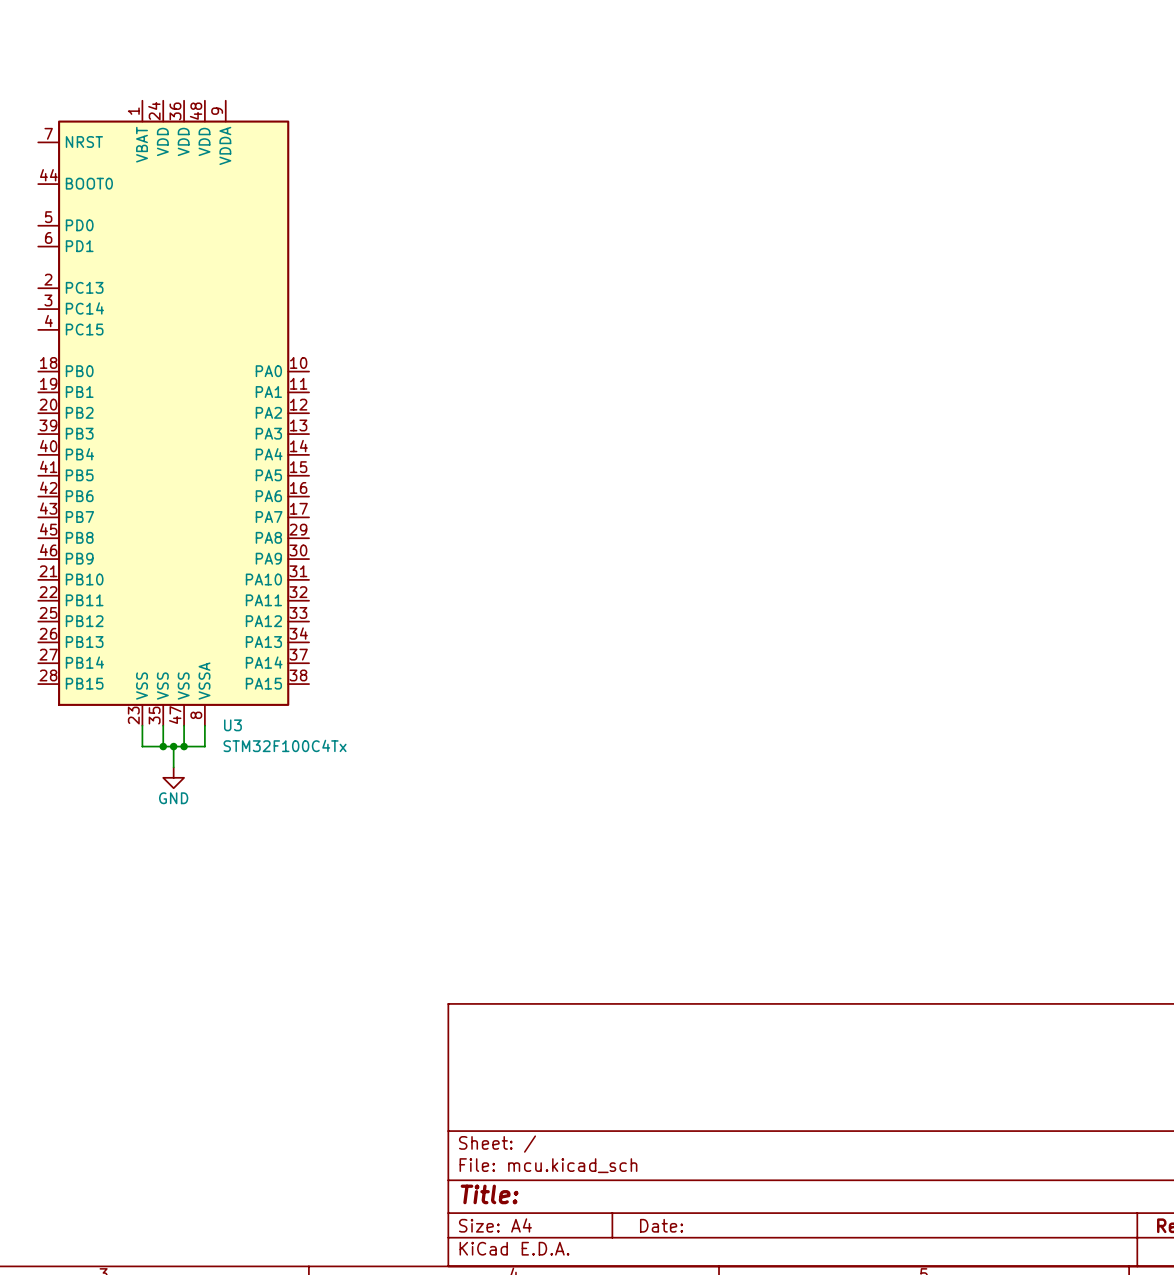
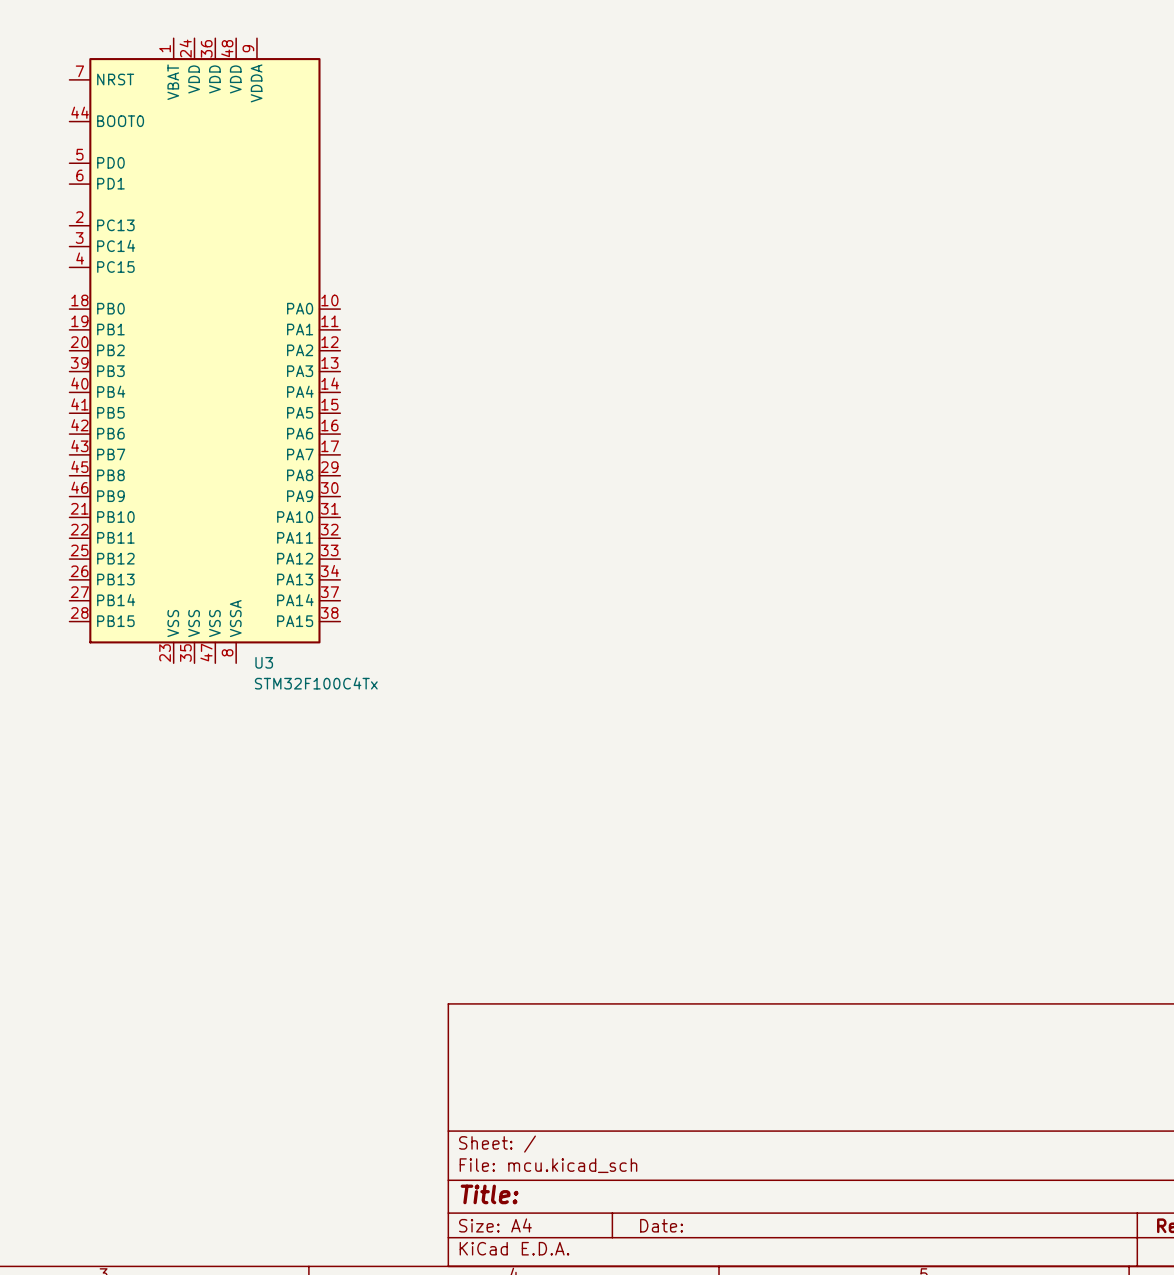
U3 position: (173, 413) -> (204, 350)
wire: (142, 725) (142, 746) (204, 746) (204, 725) -> none
wire: (163, 725) (163, 746) -> none
wire: (184, 725) (184, 746) -> none
junction: (163, 746) -> none
wire: (173, 746) (173, 767) -> none
junction: (173, 746) -> none
junction: (184, 746) -> none
power symbol: GND (173, 777) -> none

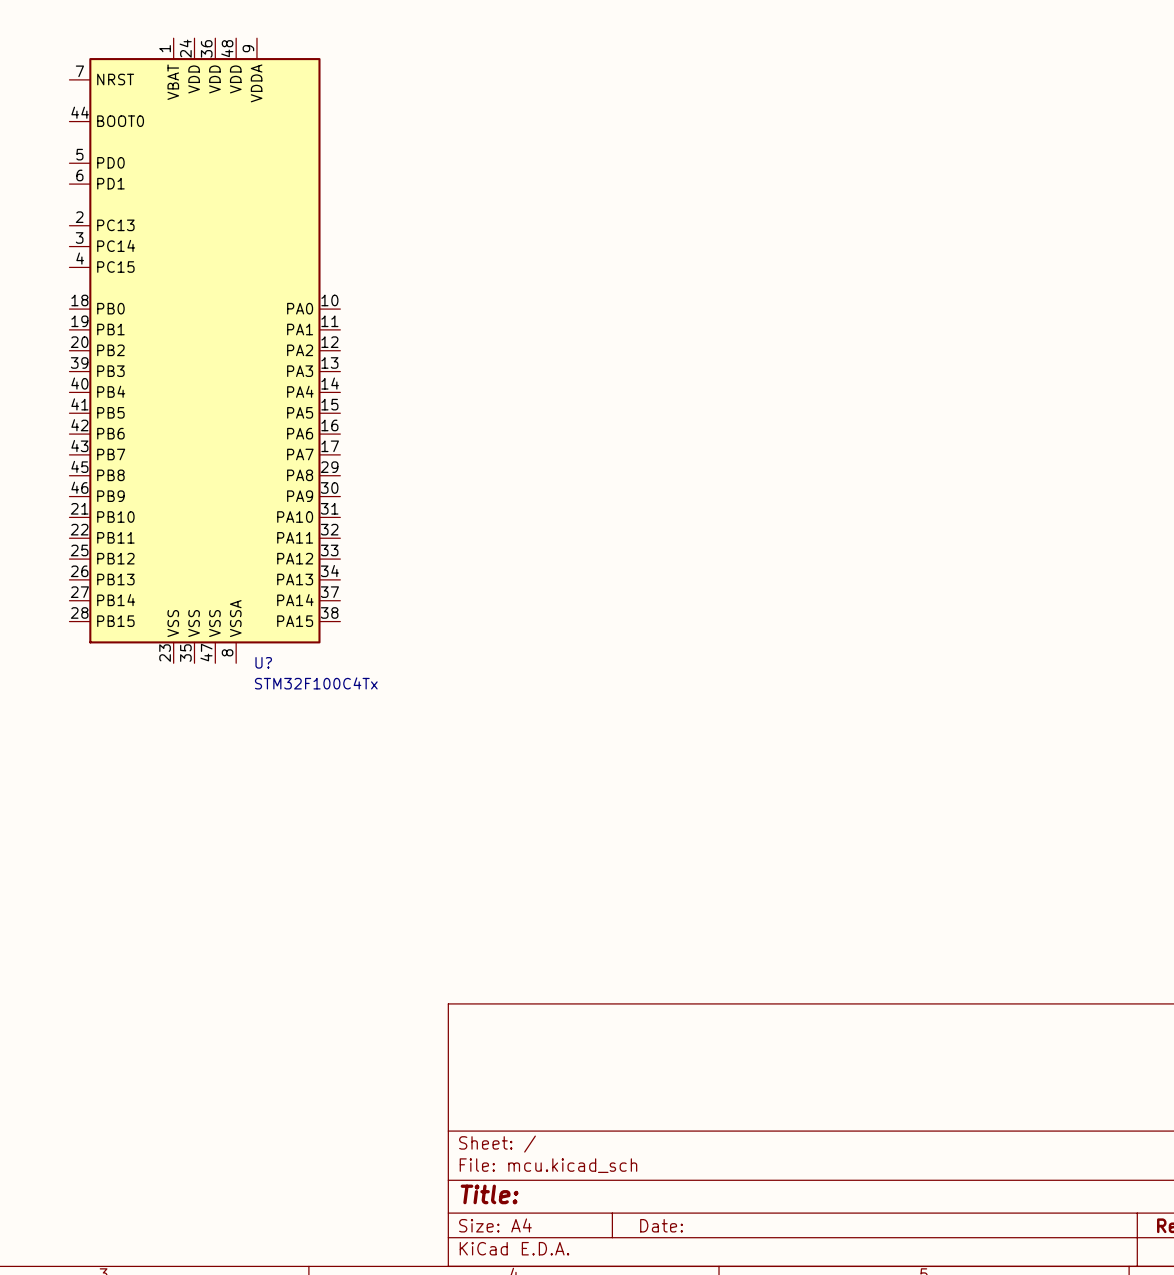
U3 name: U3 (264, 662) -> U? (263, 662)

